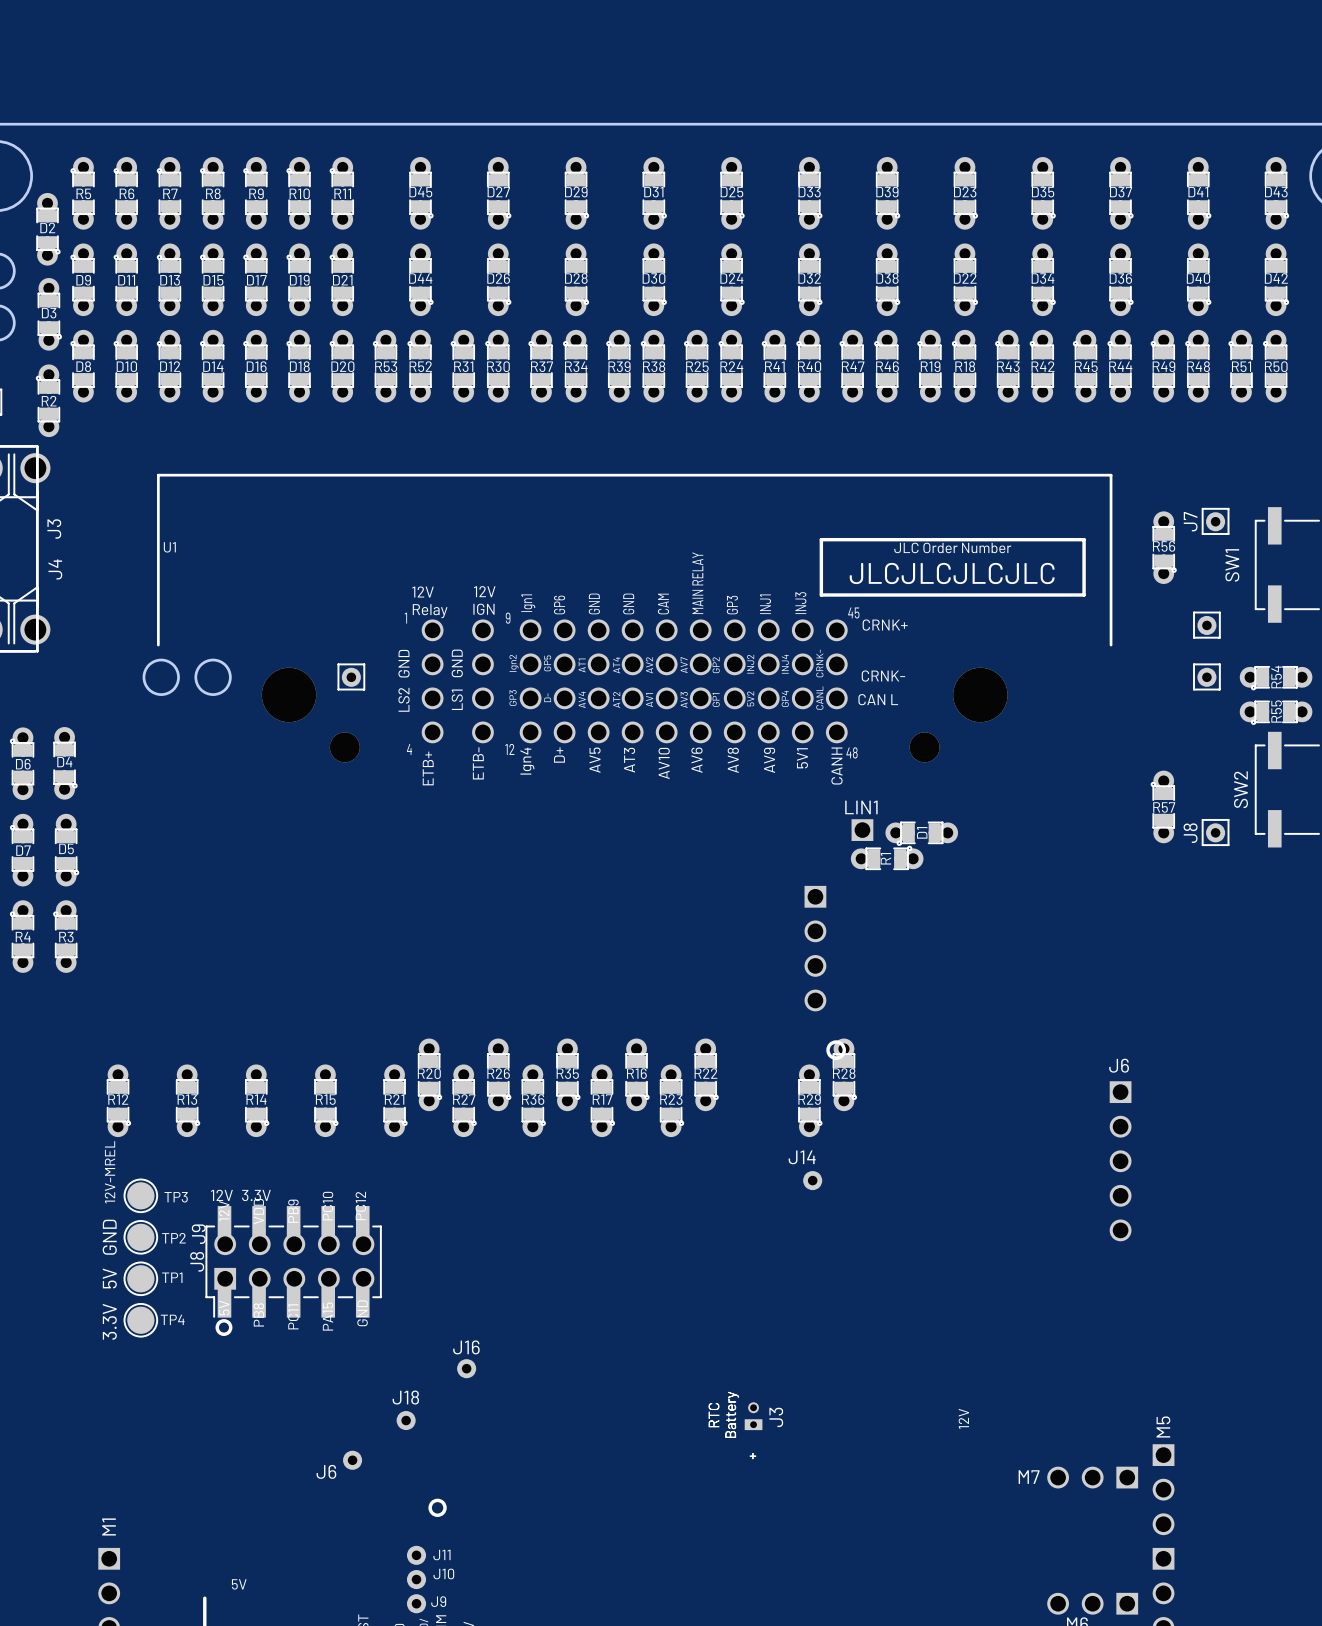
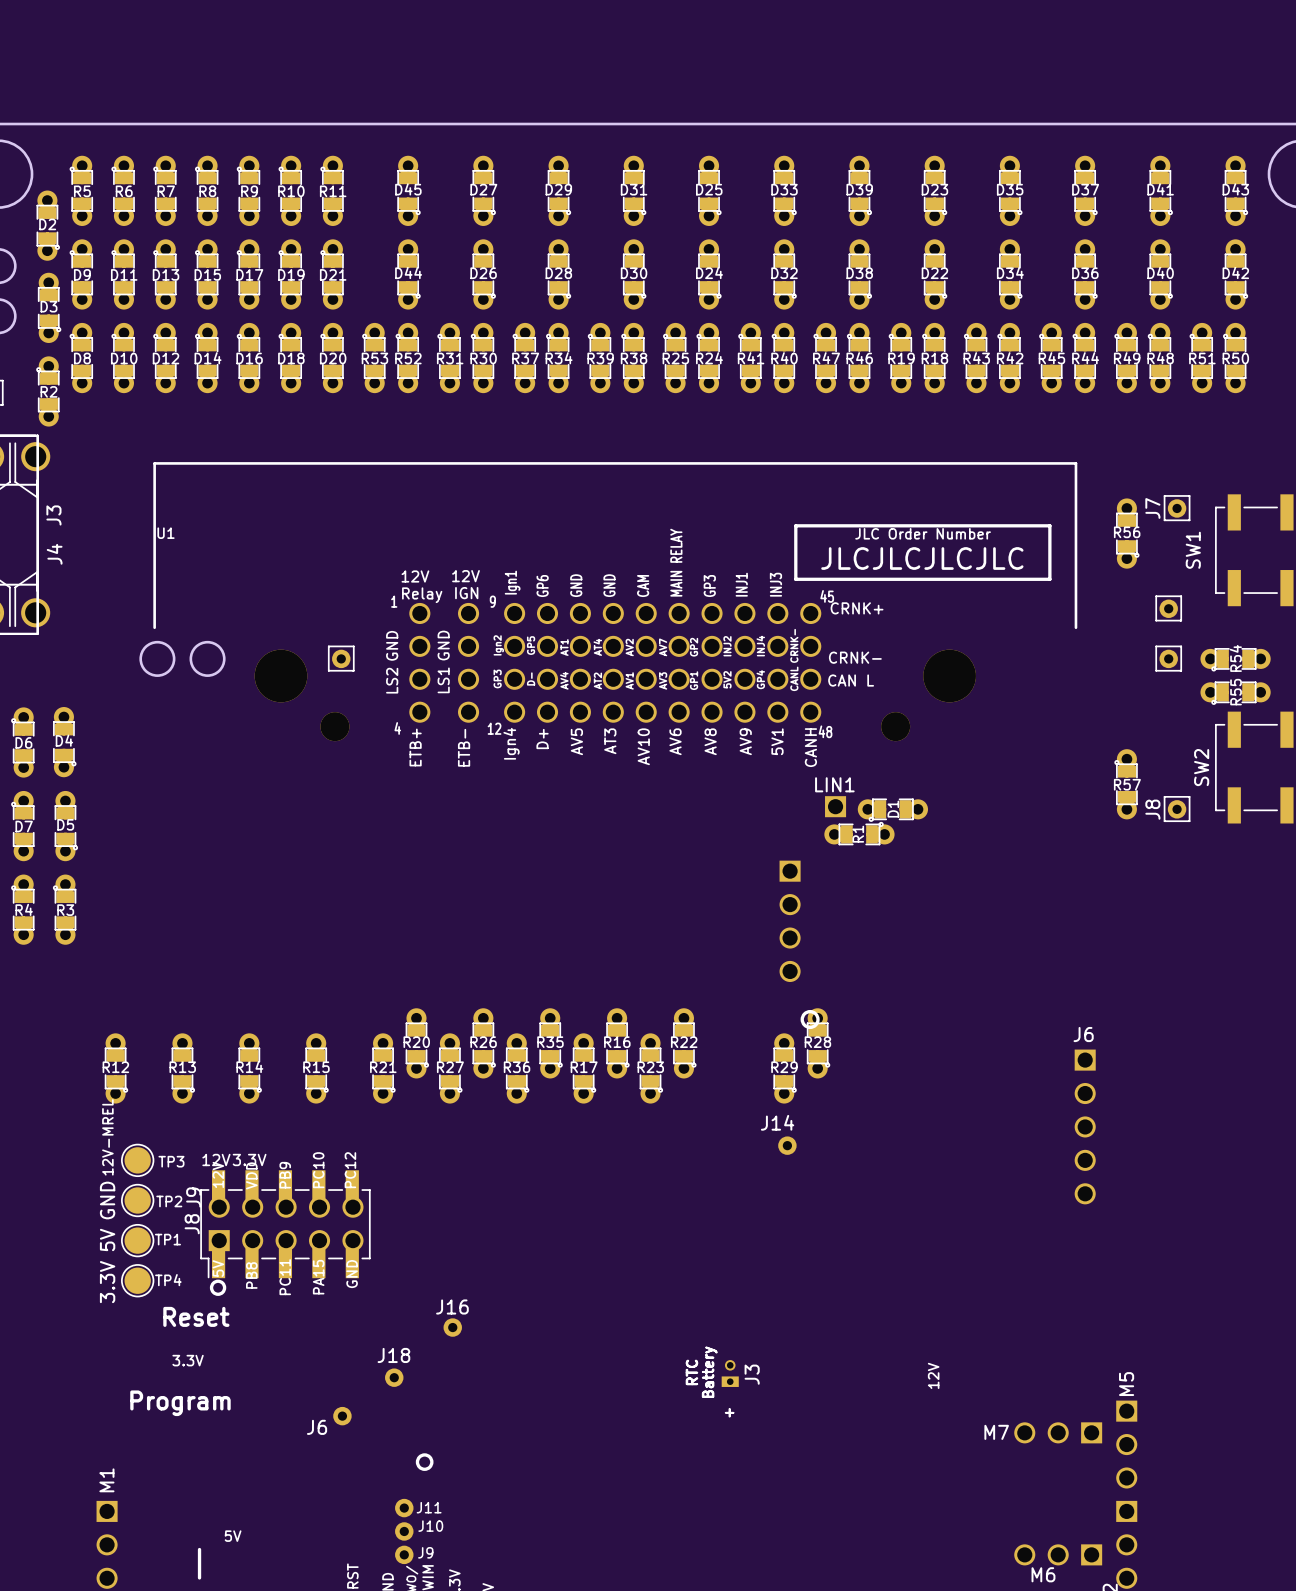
text: none -> Reset (196, 1316)
text: none -> 3.3V (188, 1360)
text: none -> Program (180, 1403)

